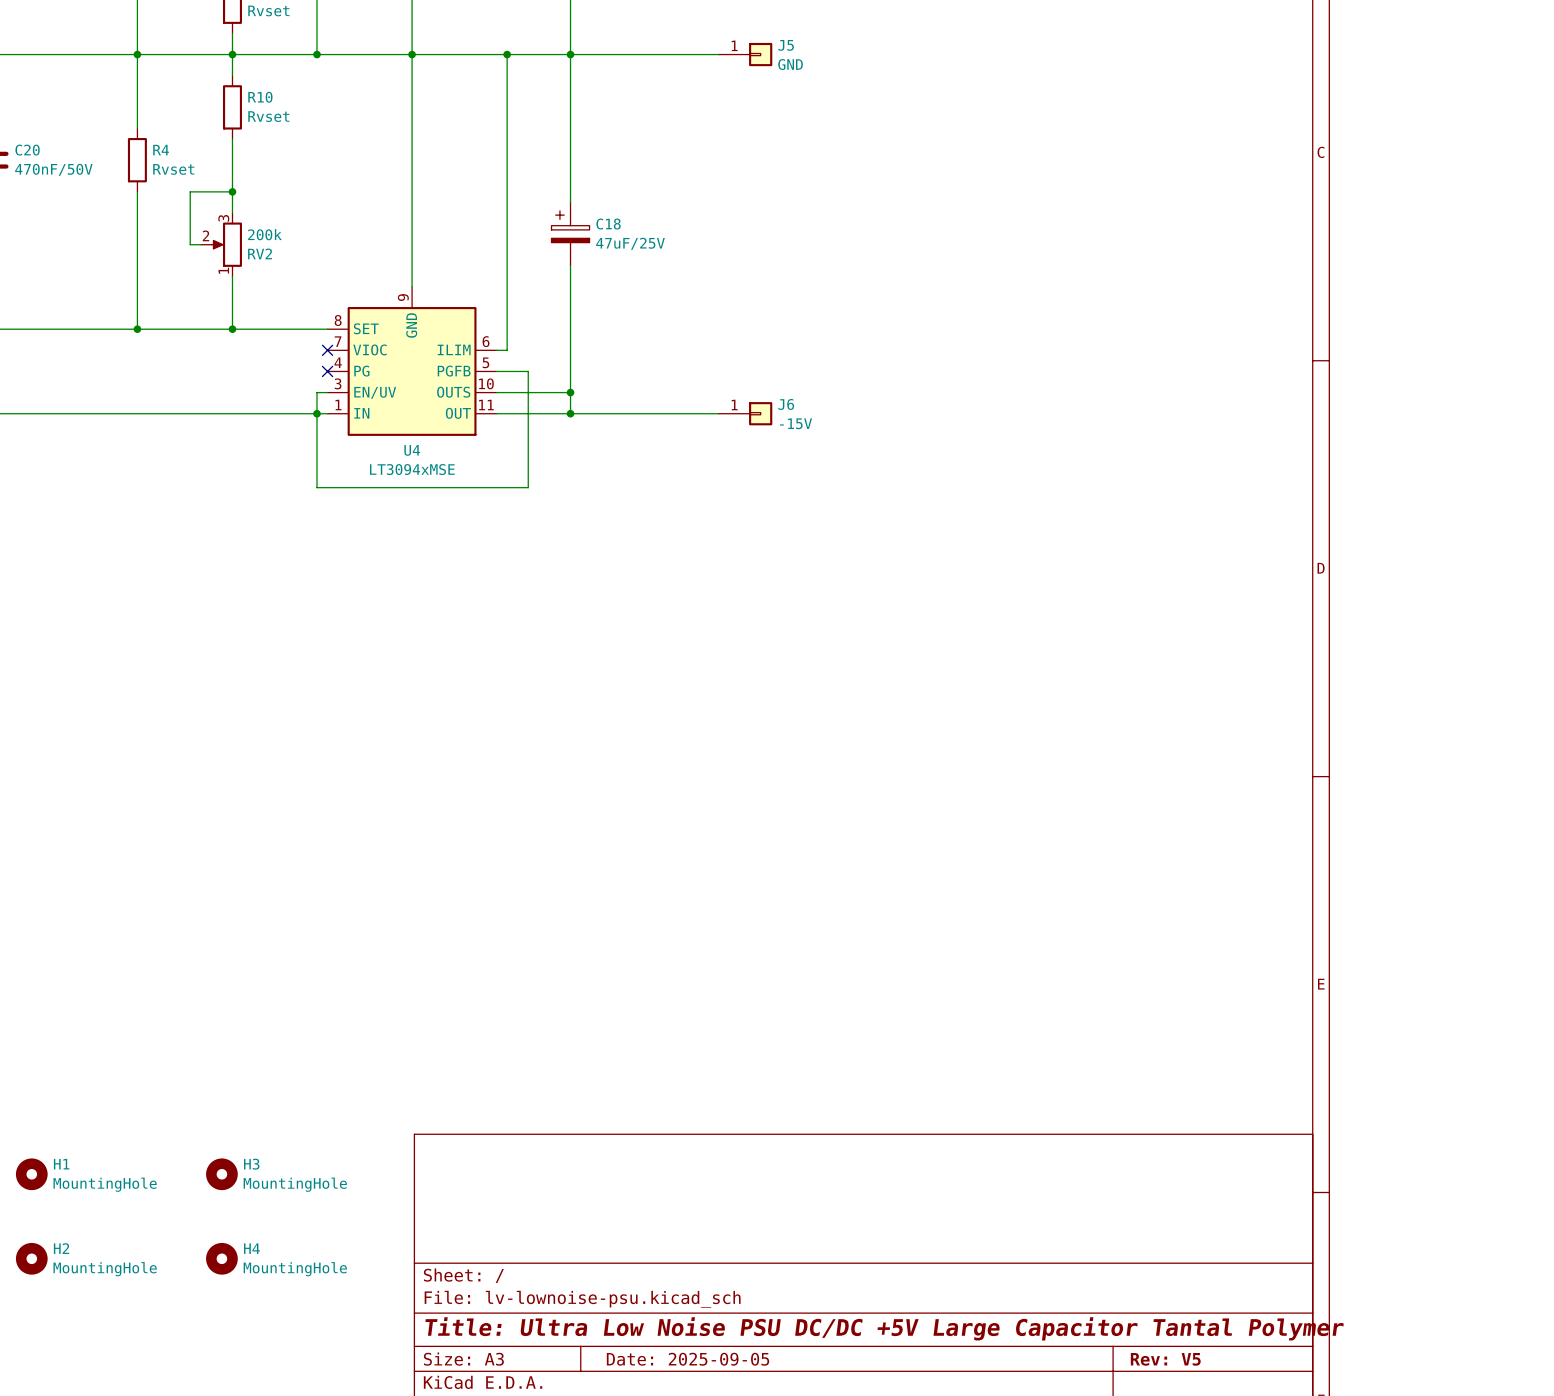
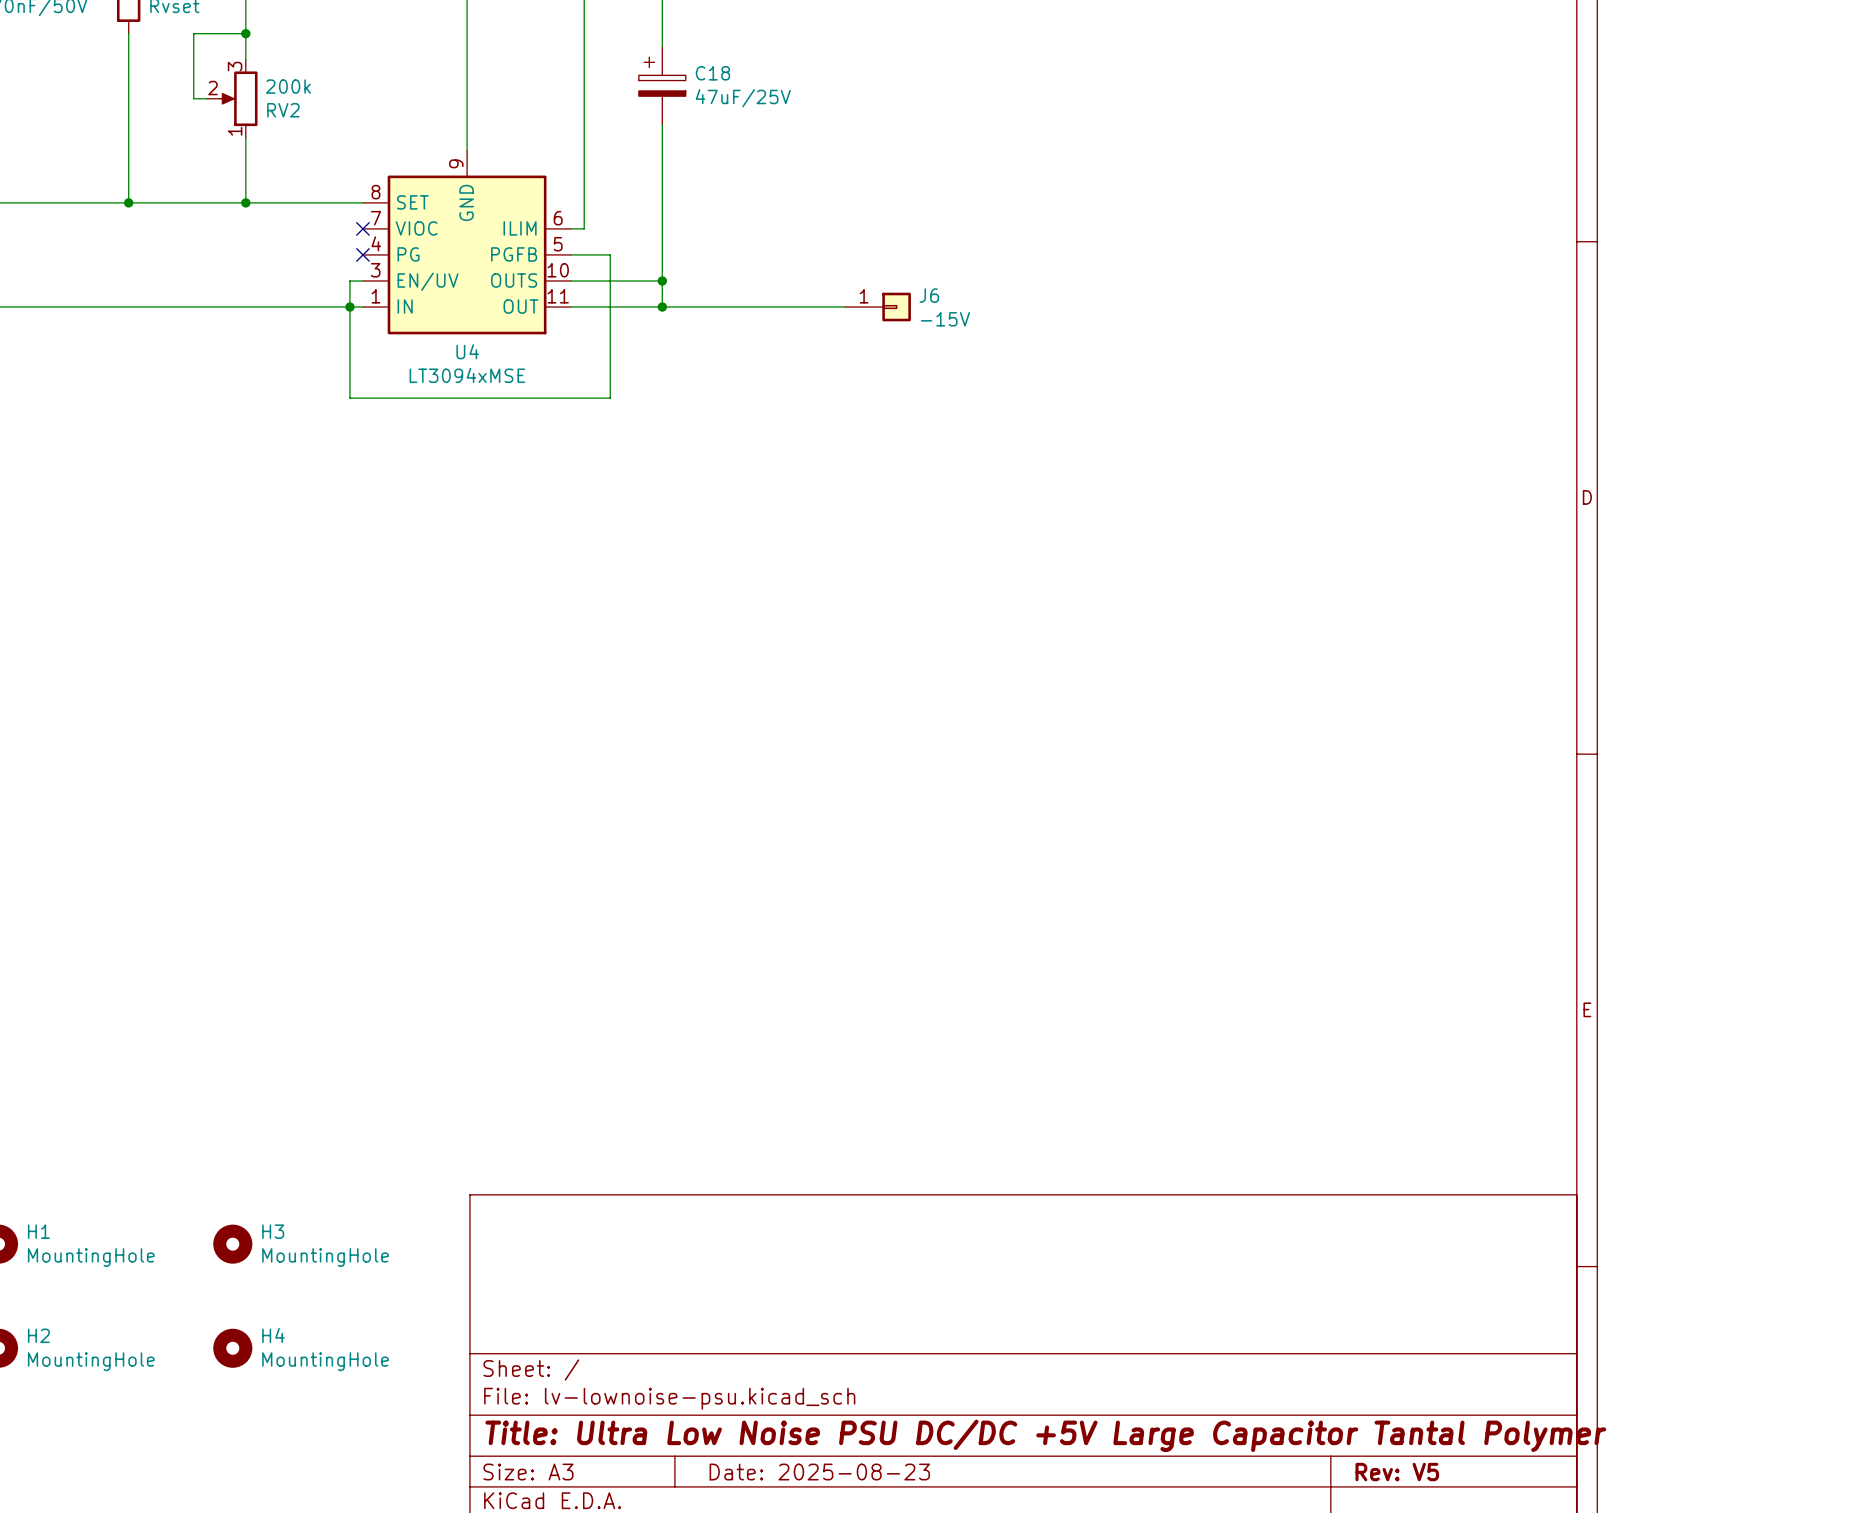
title block: Date: 2025-09-05 (688, 1359) -> Date: 2025-08-23 (819, 1472)

